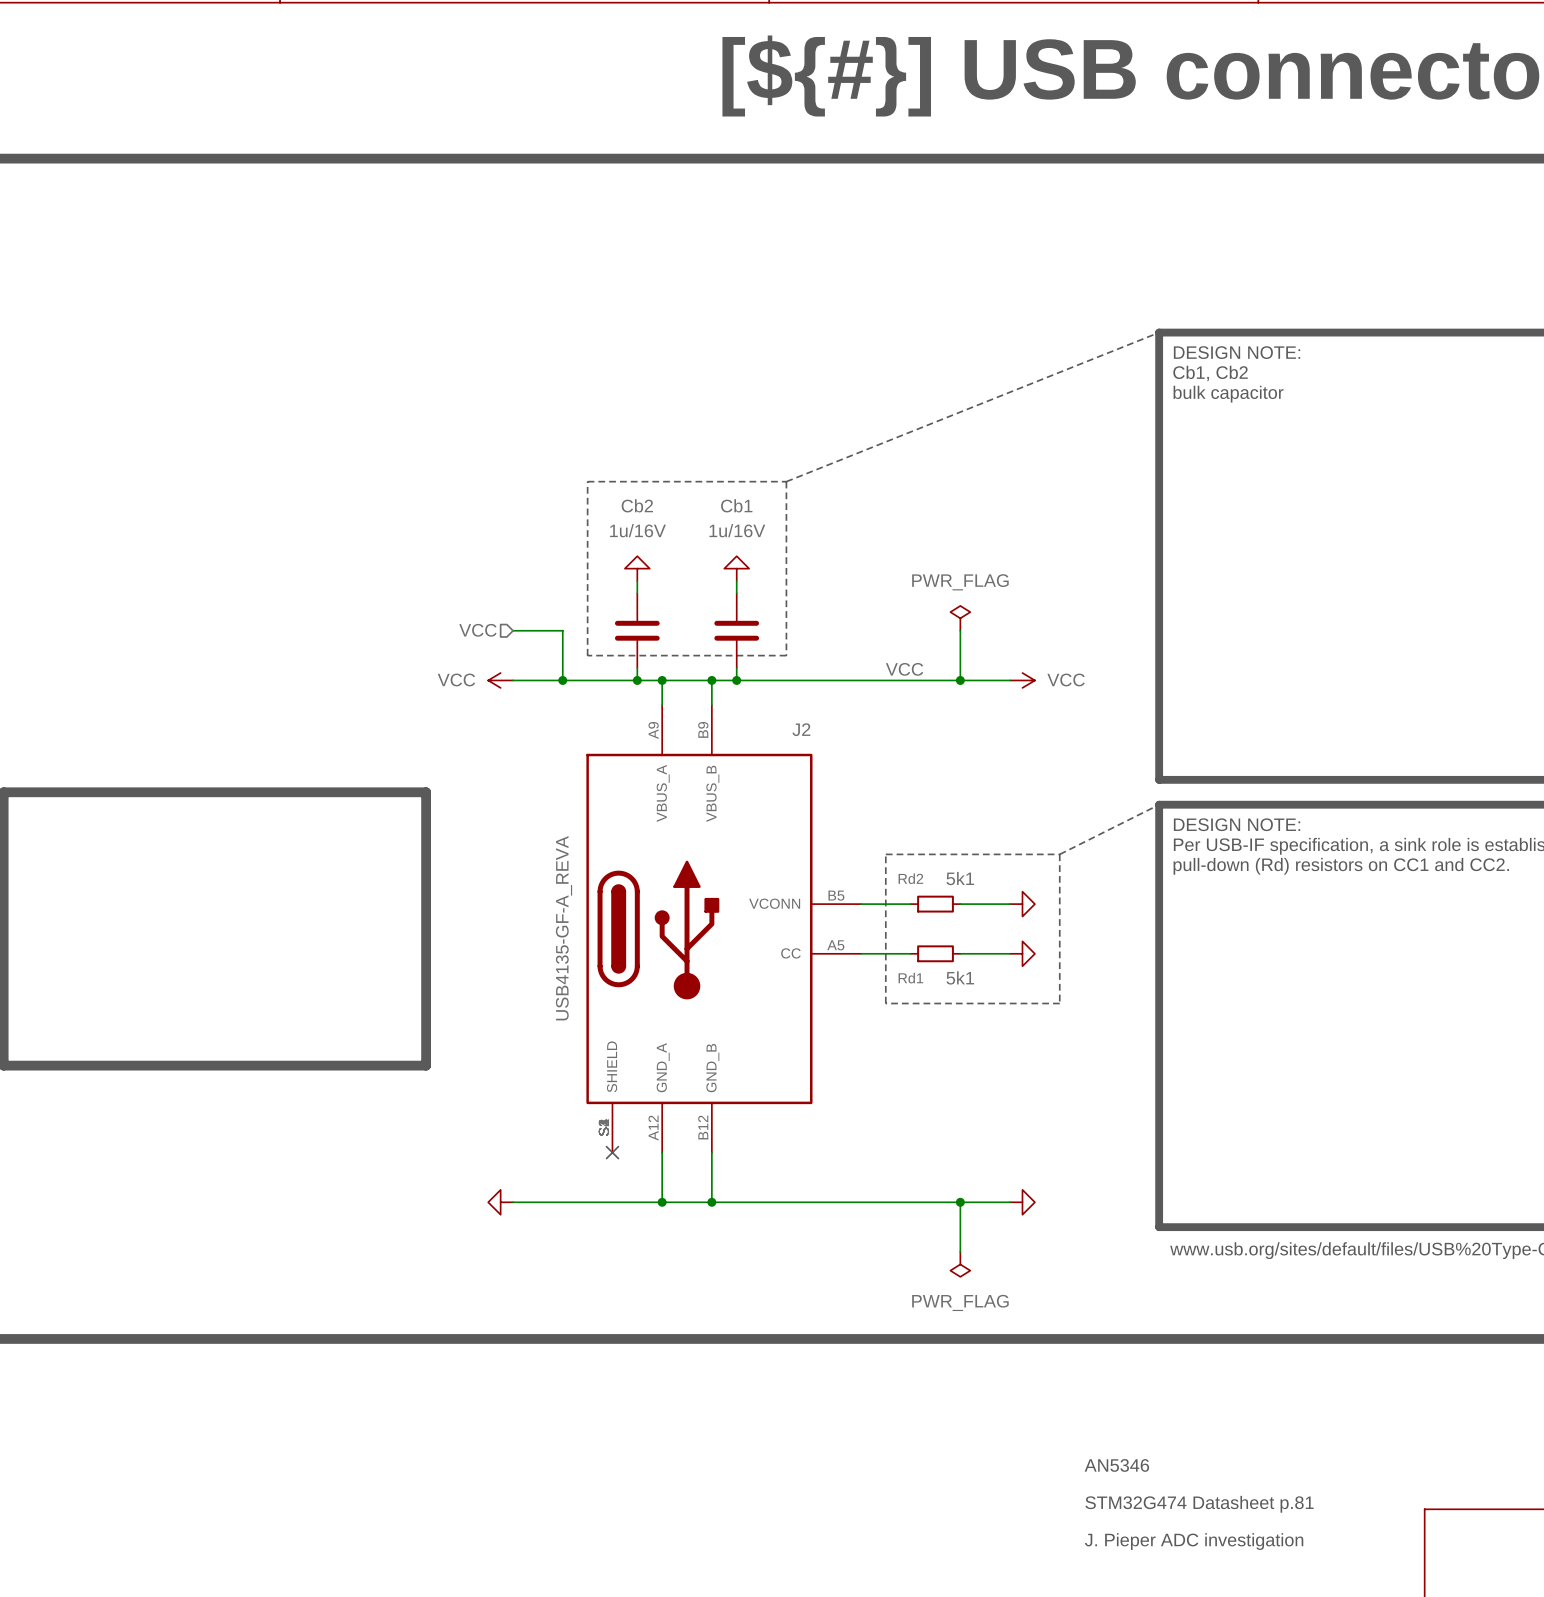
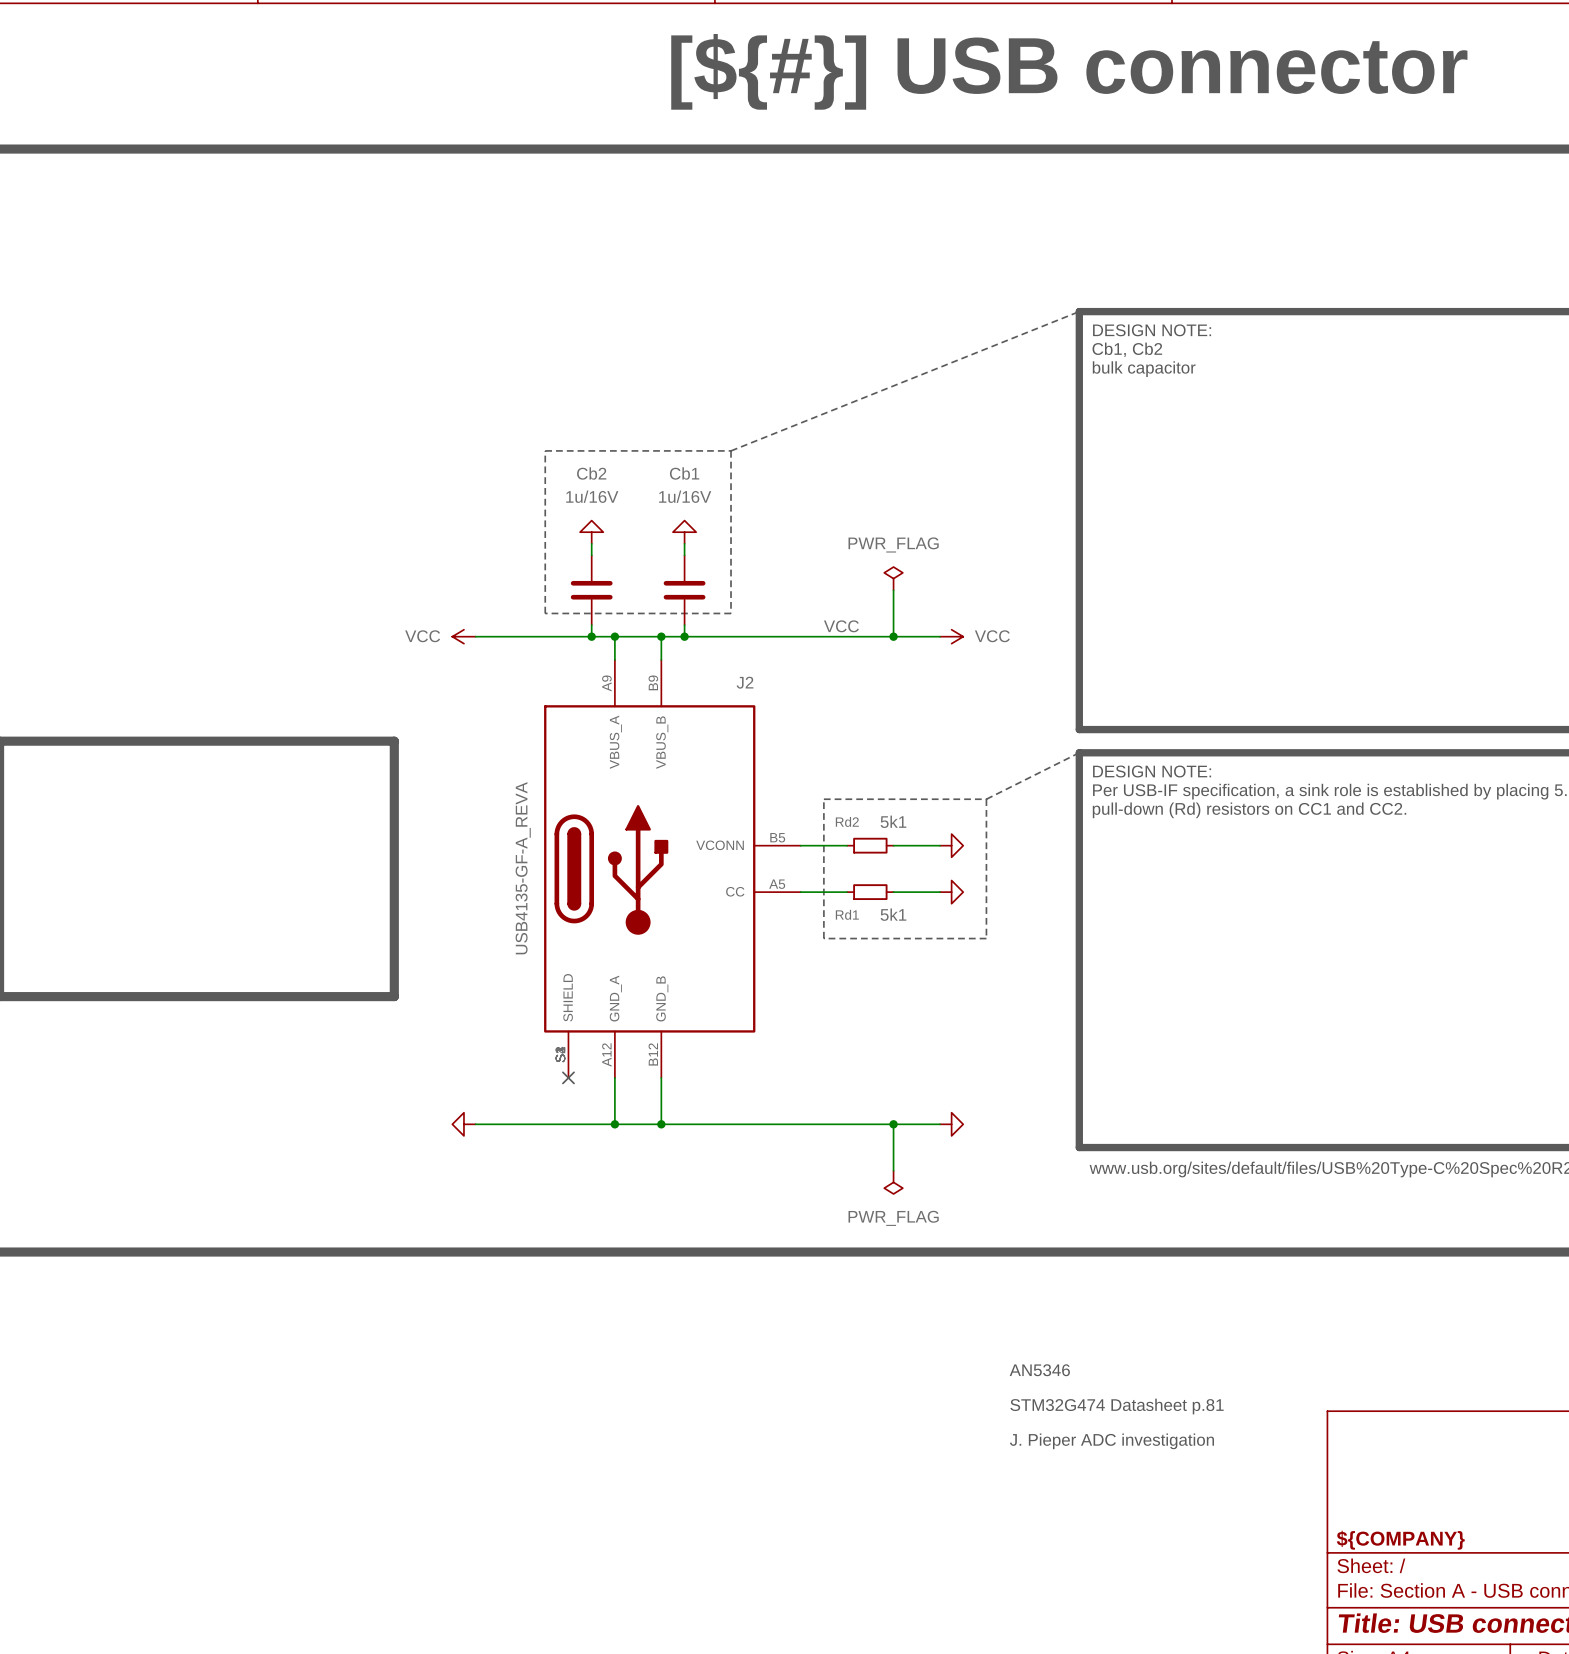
hierarchical label: VCC (477, 630) -> none
wire: (513, 630) (562, 630) (562, 680) -> none
junction: (562, 680) -> none

